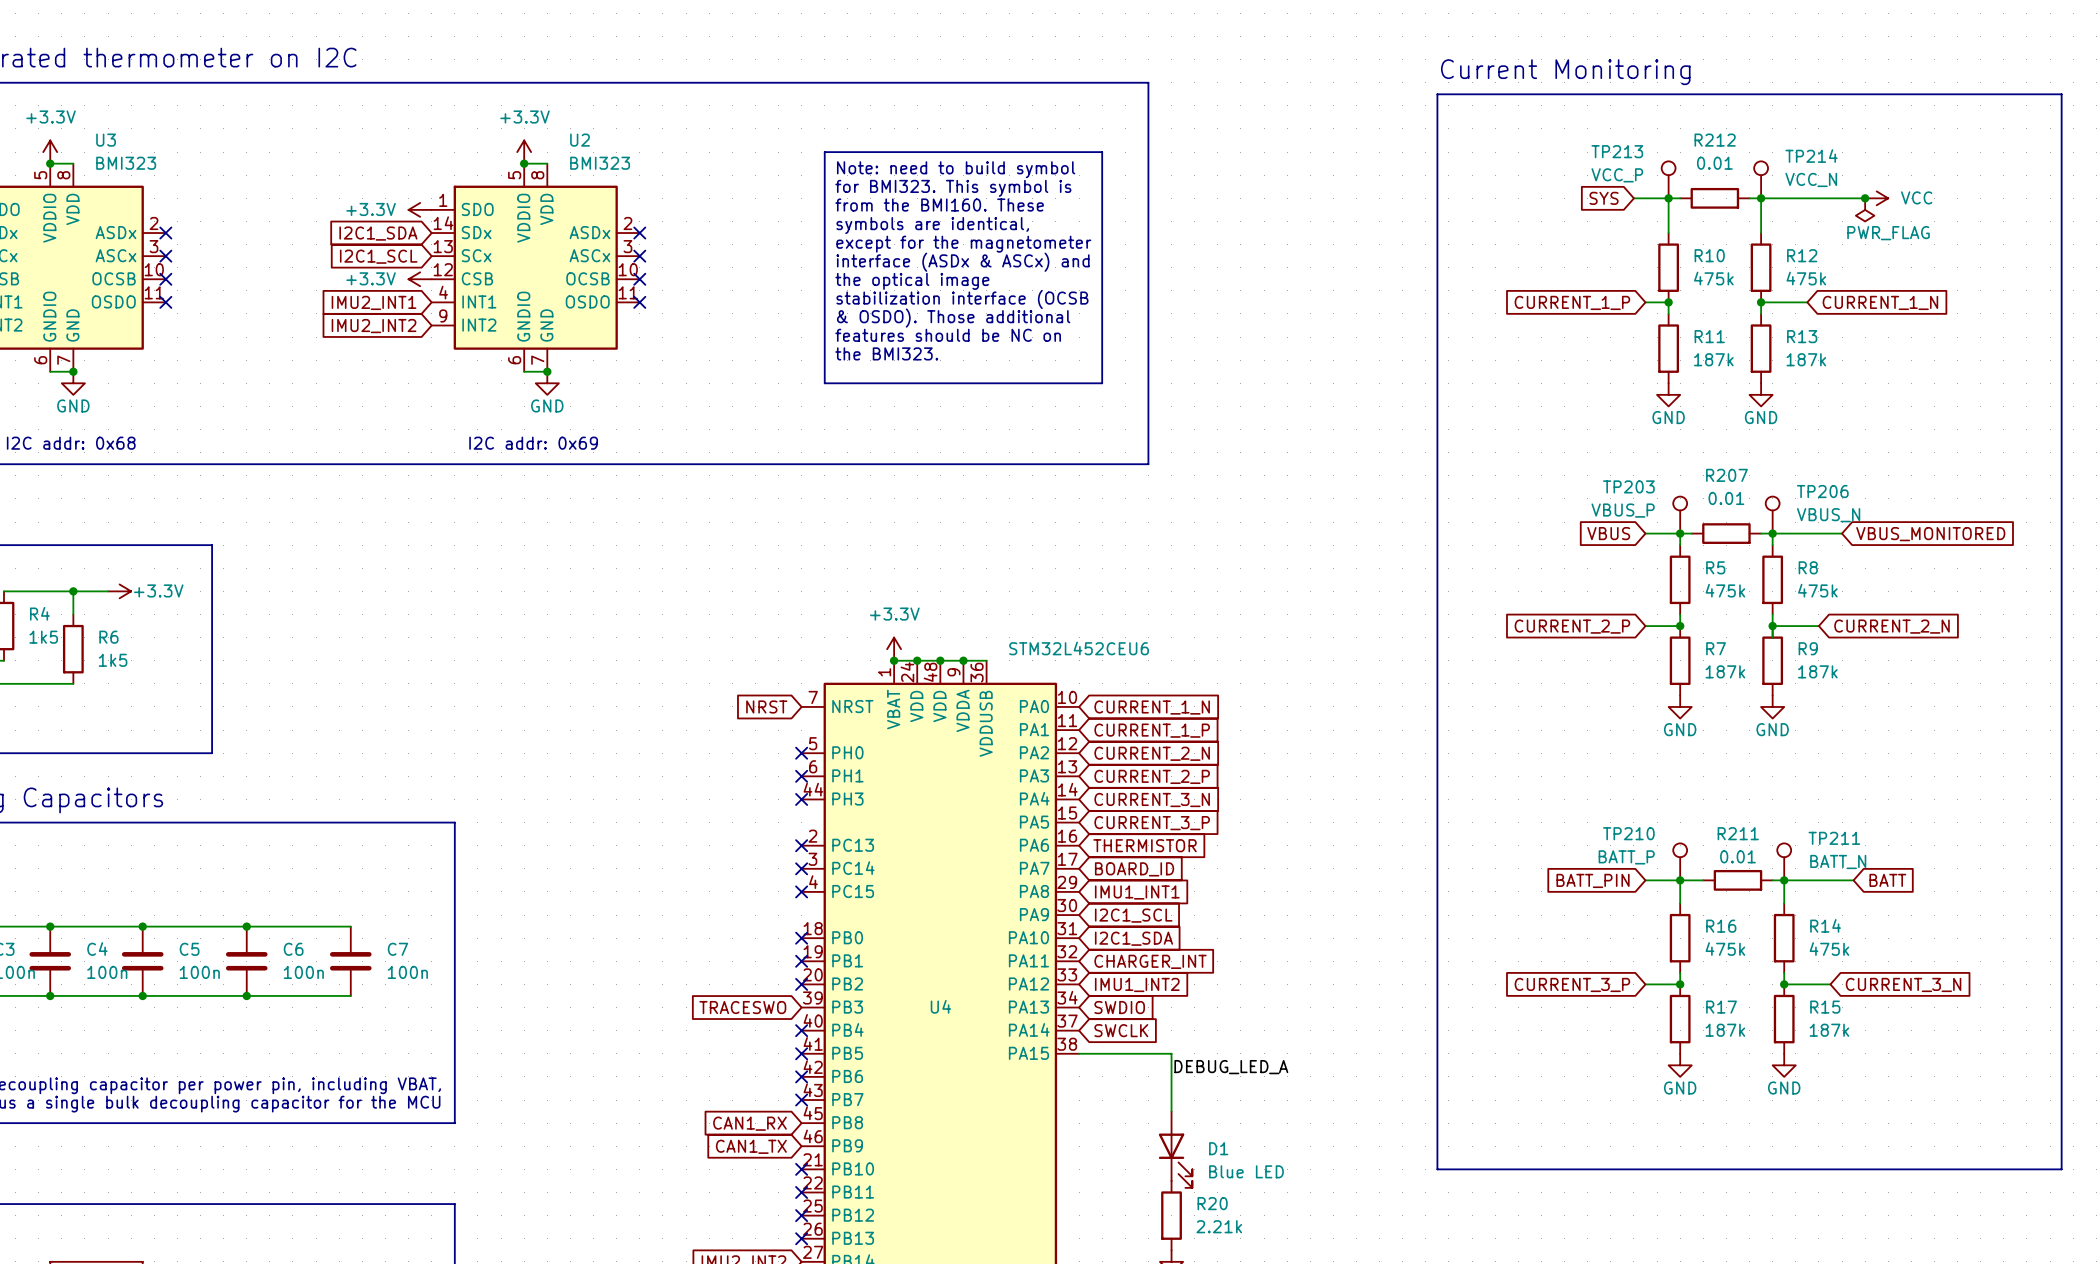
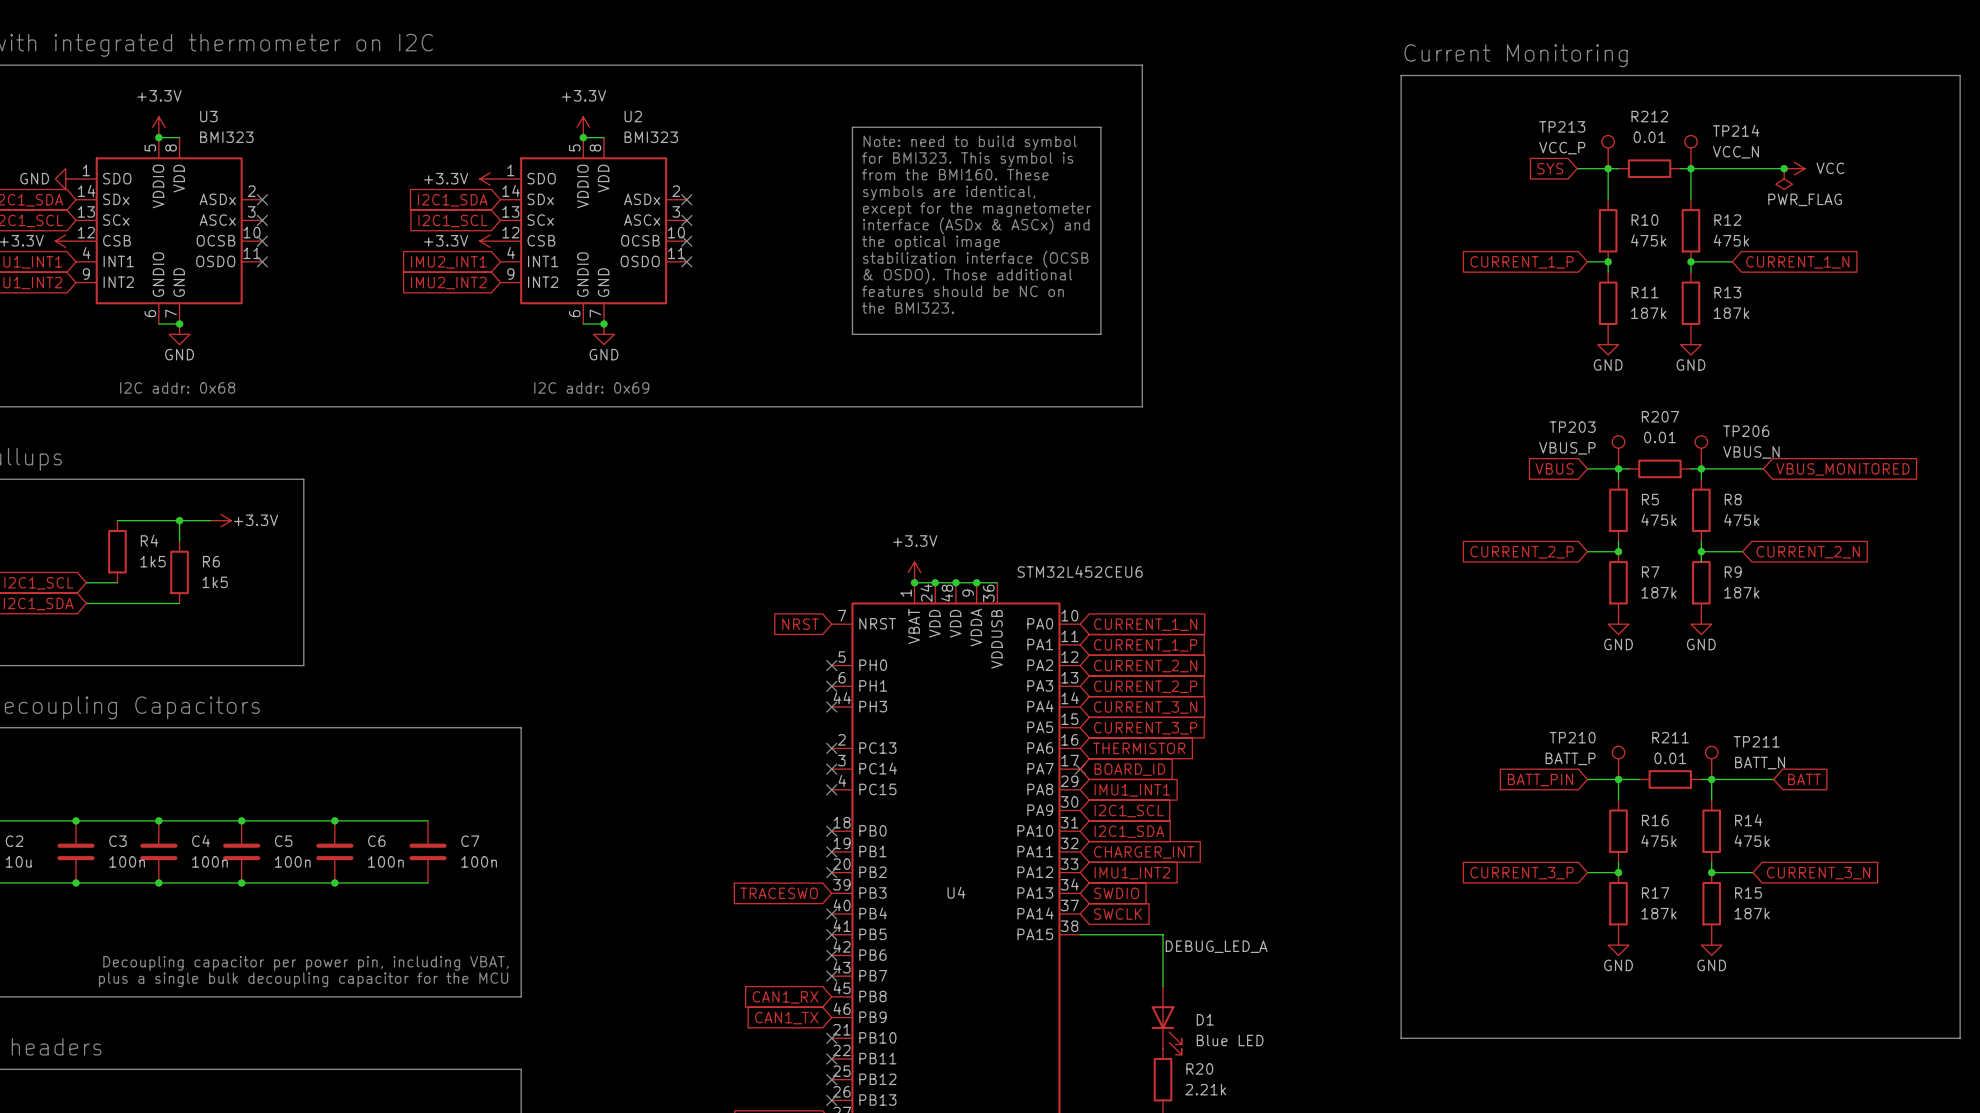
no-connect mark: none -> (1080, 769)

